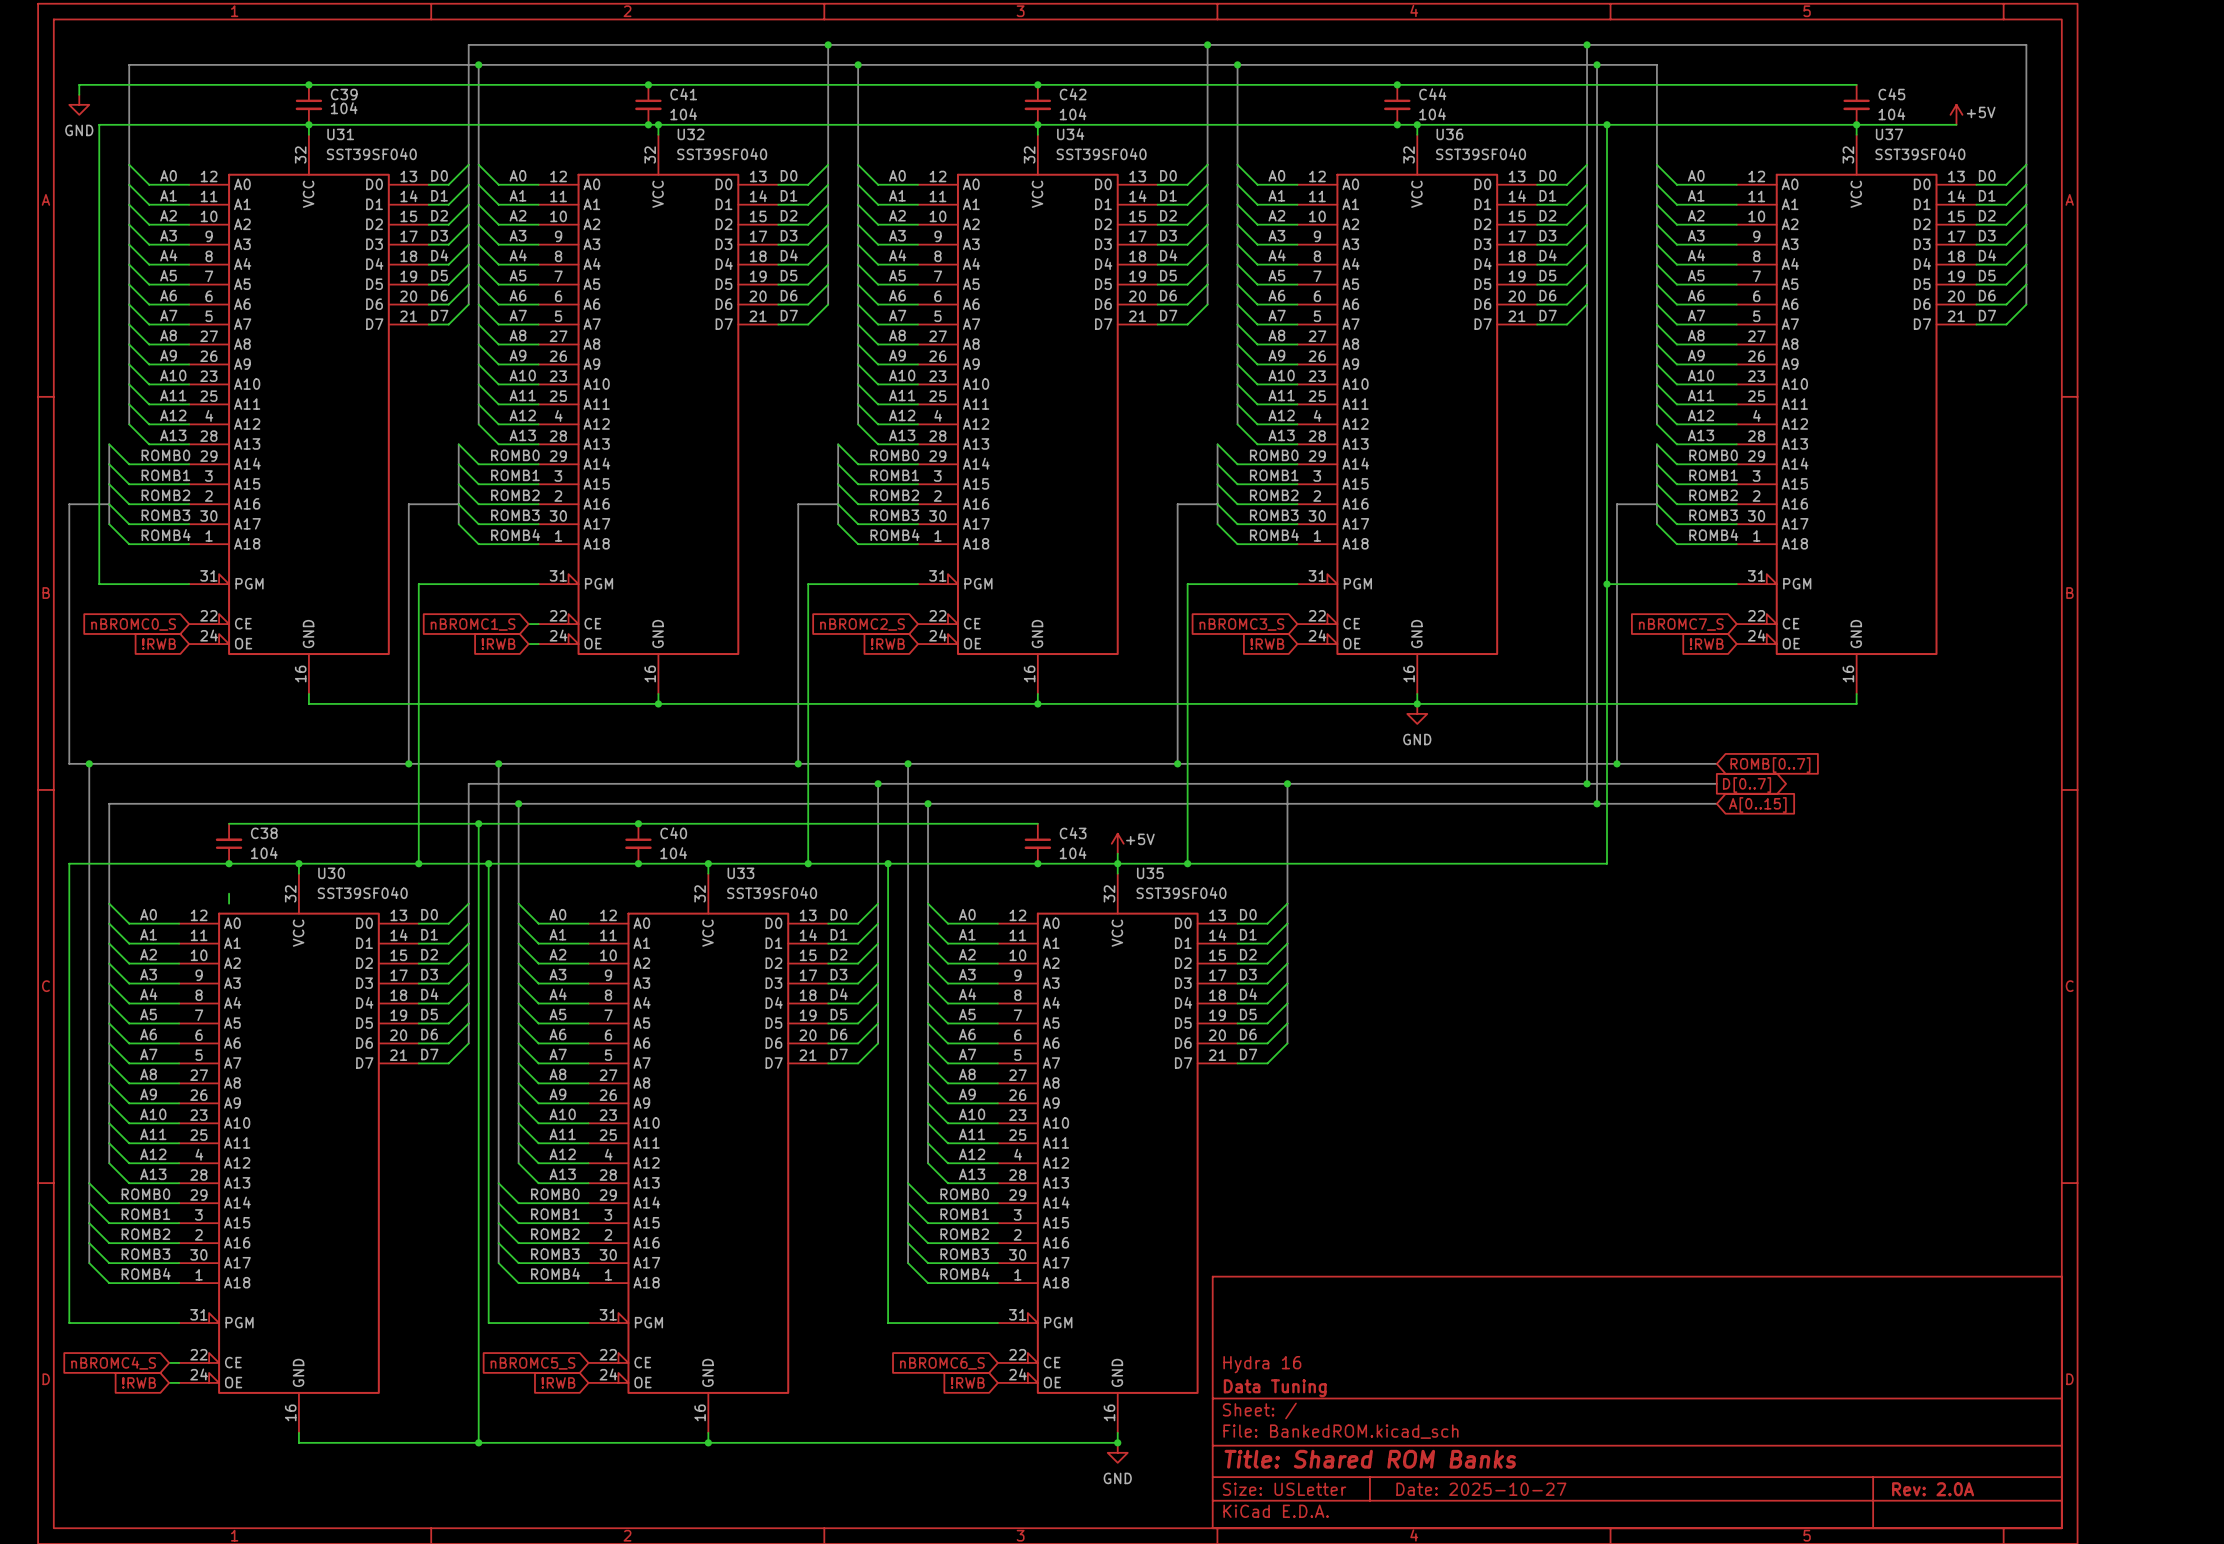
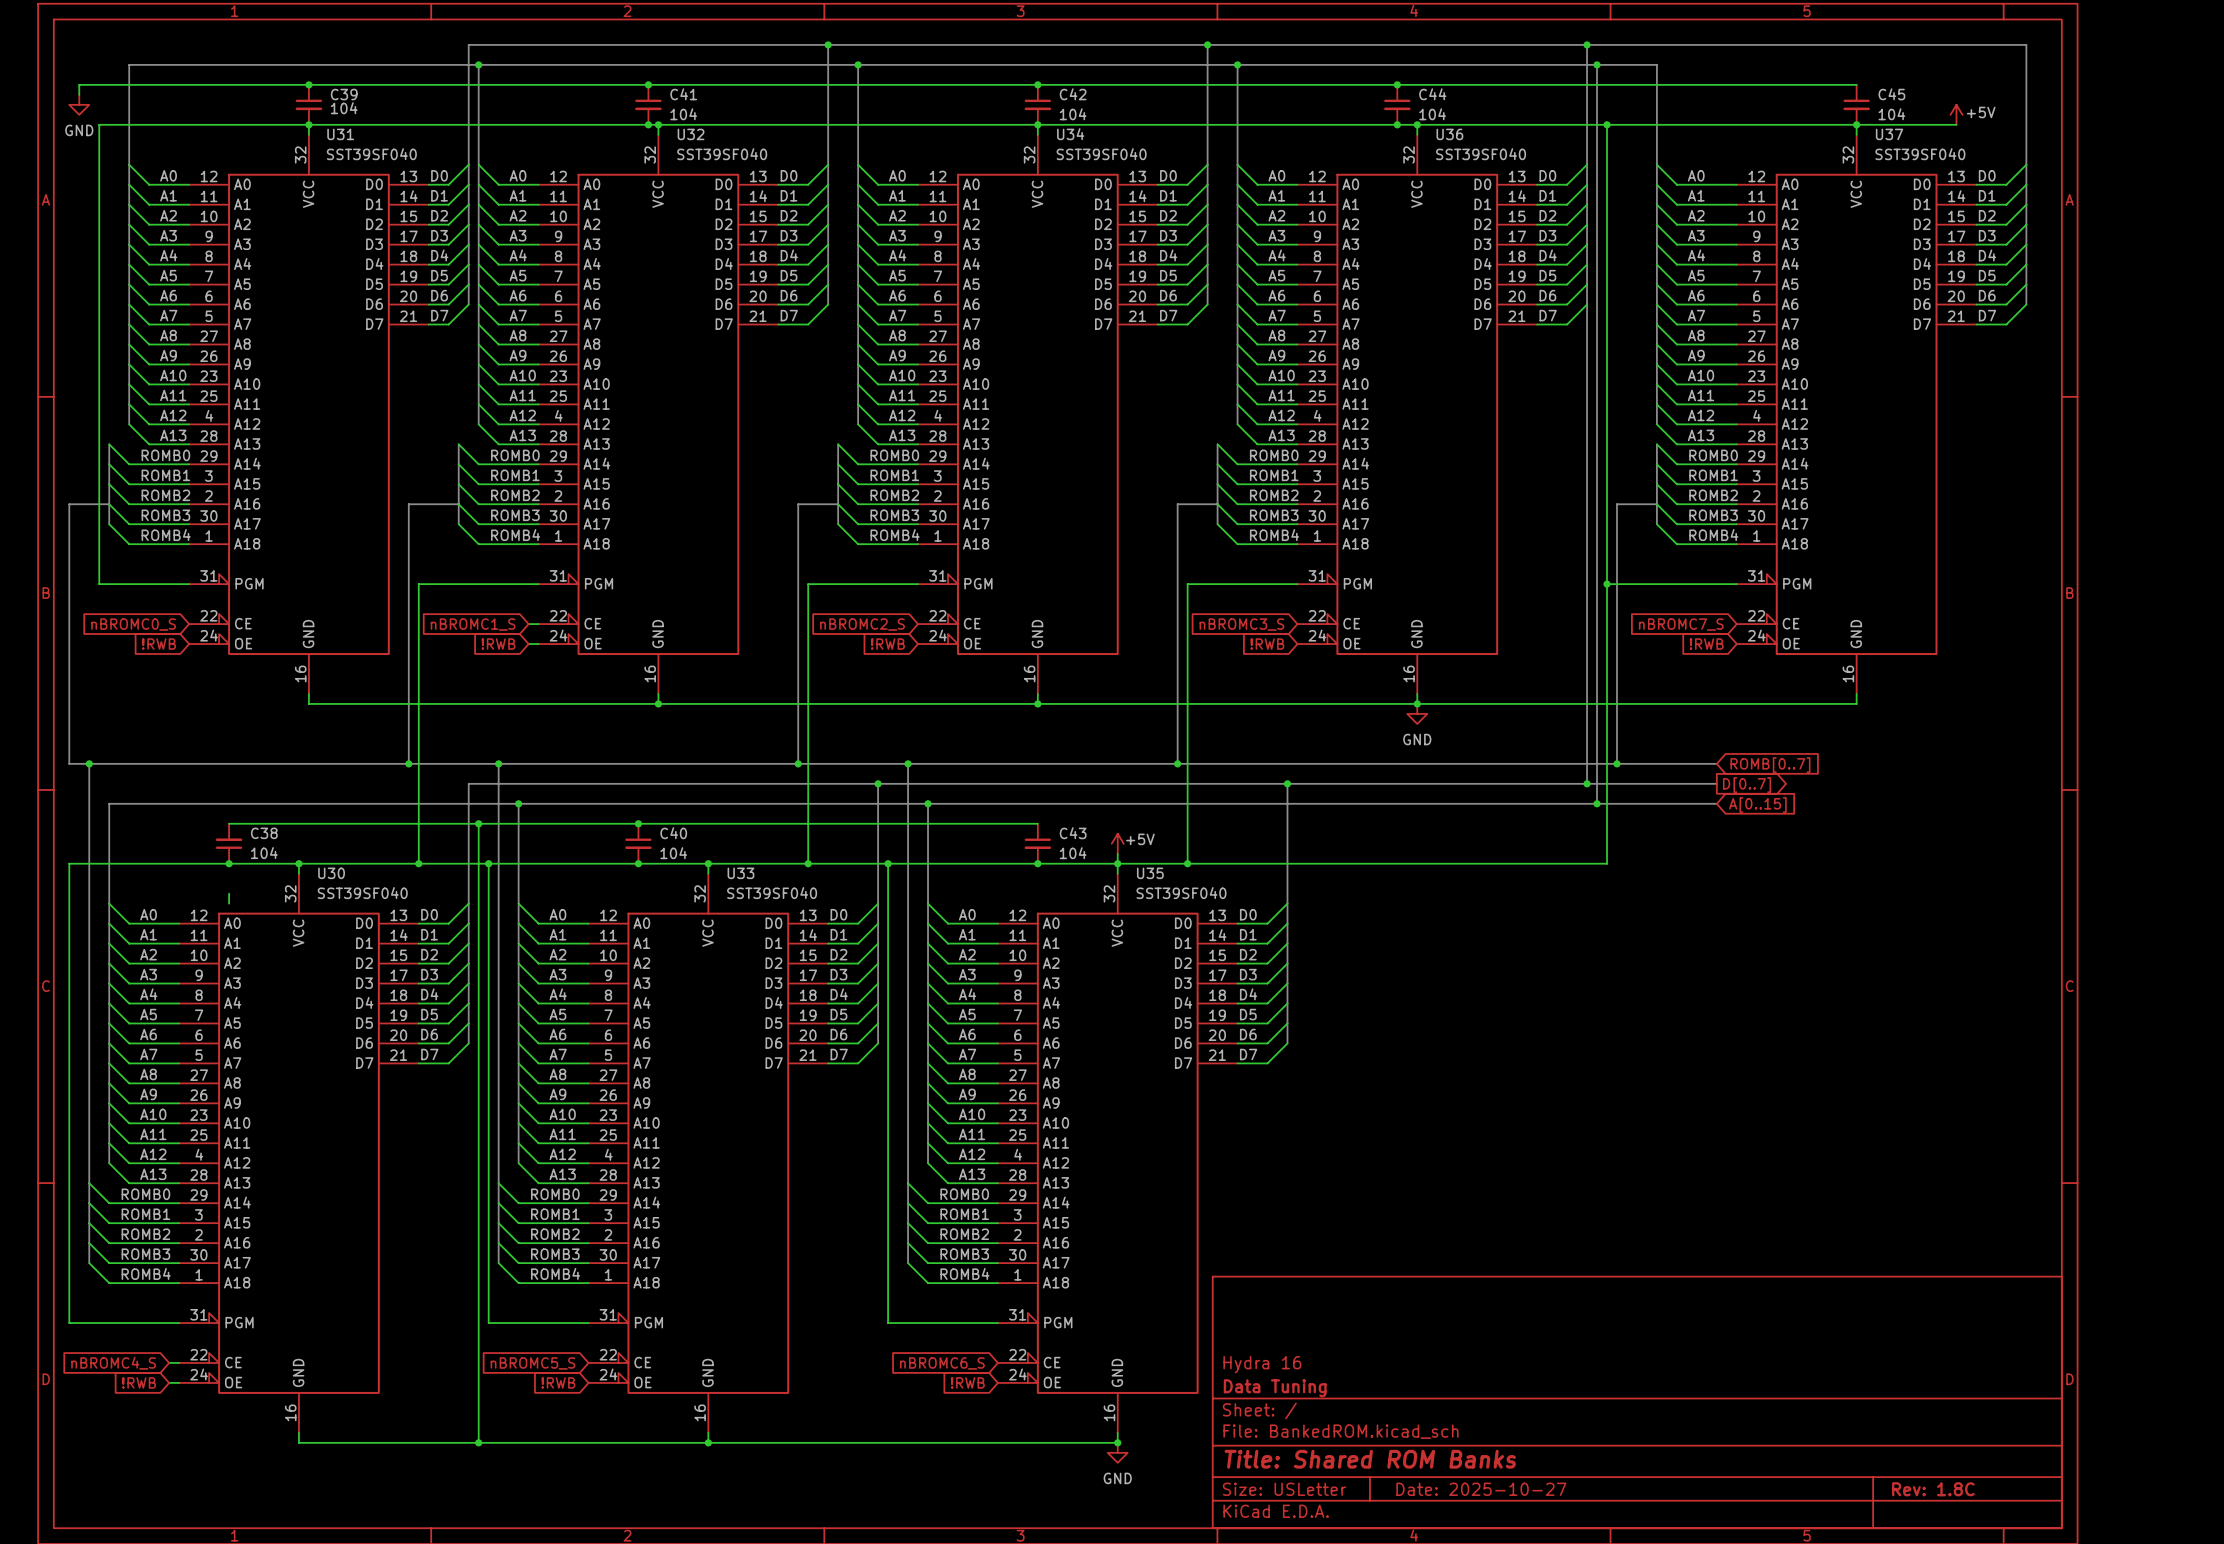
title block: Rev: 2.0A (1933, 1489) -> Rev: 1.8C (1933, 1489)

